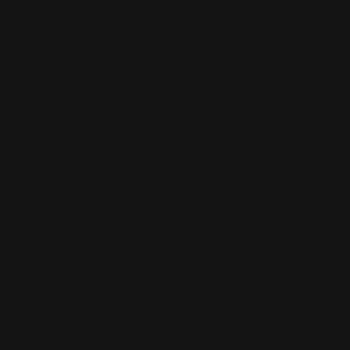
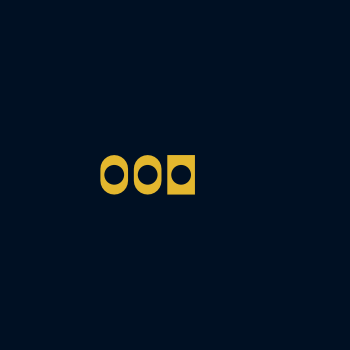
part: none -> (147, 174)

